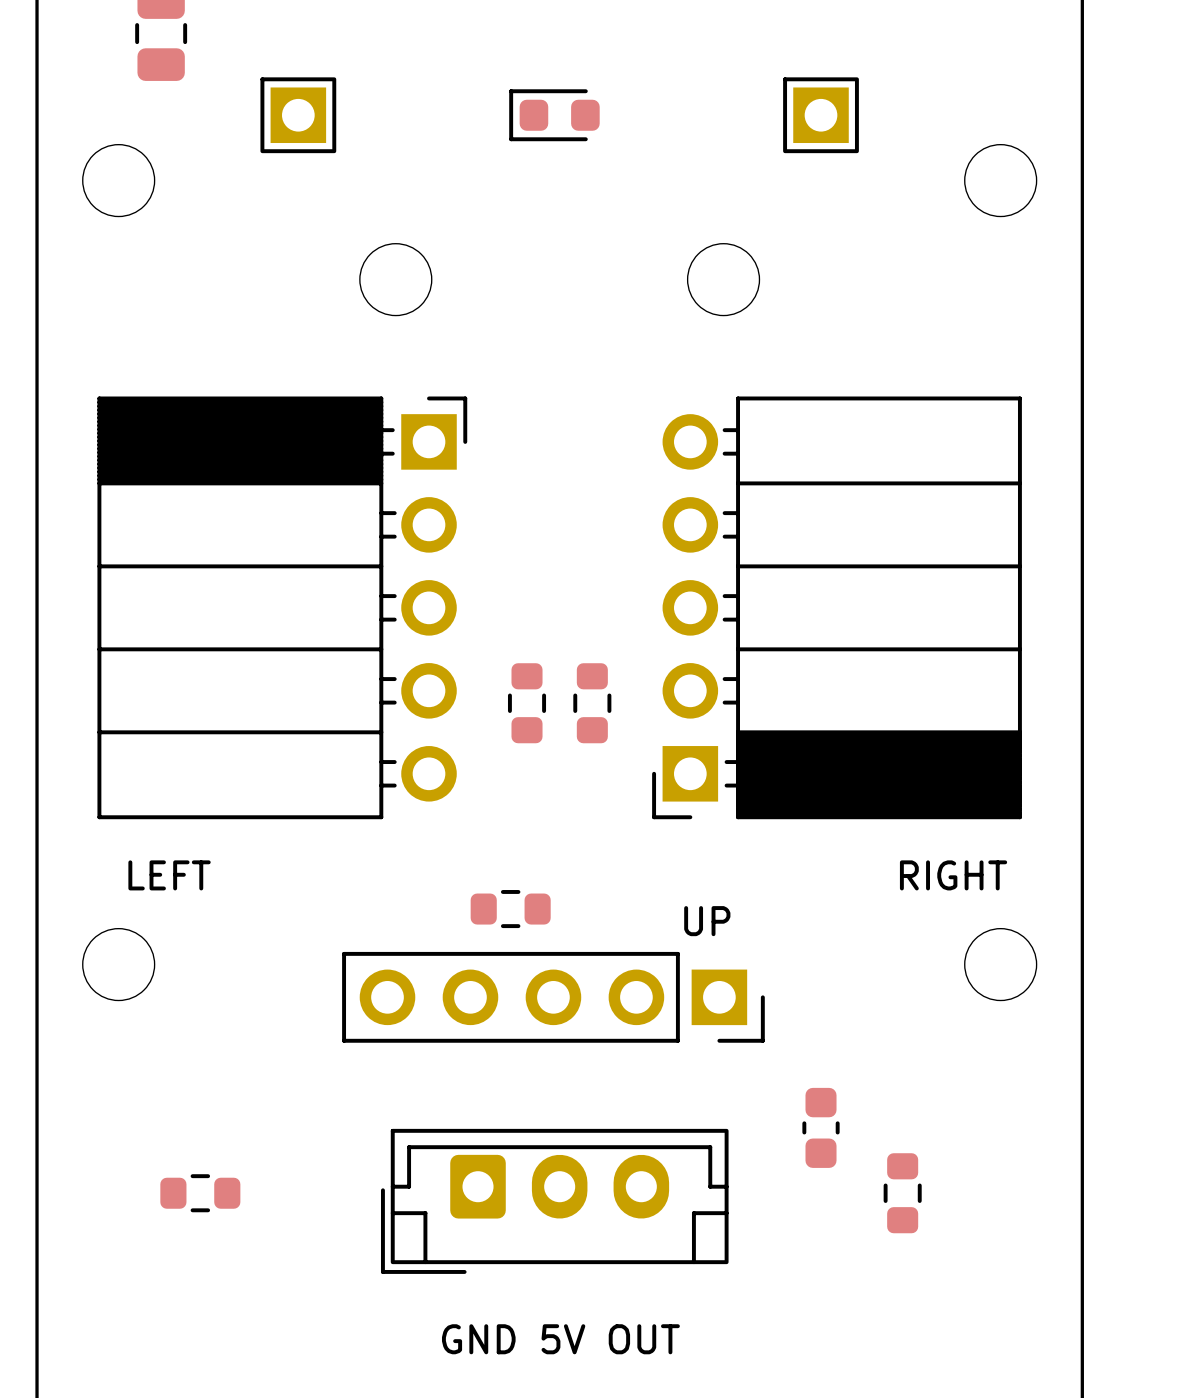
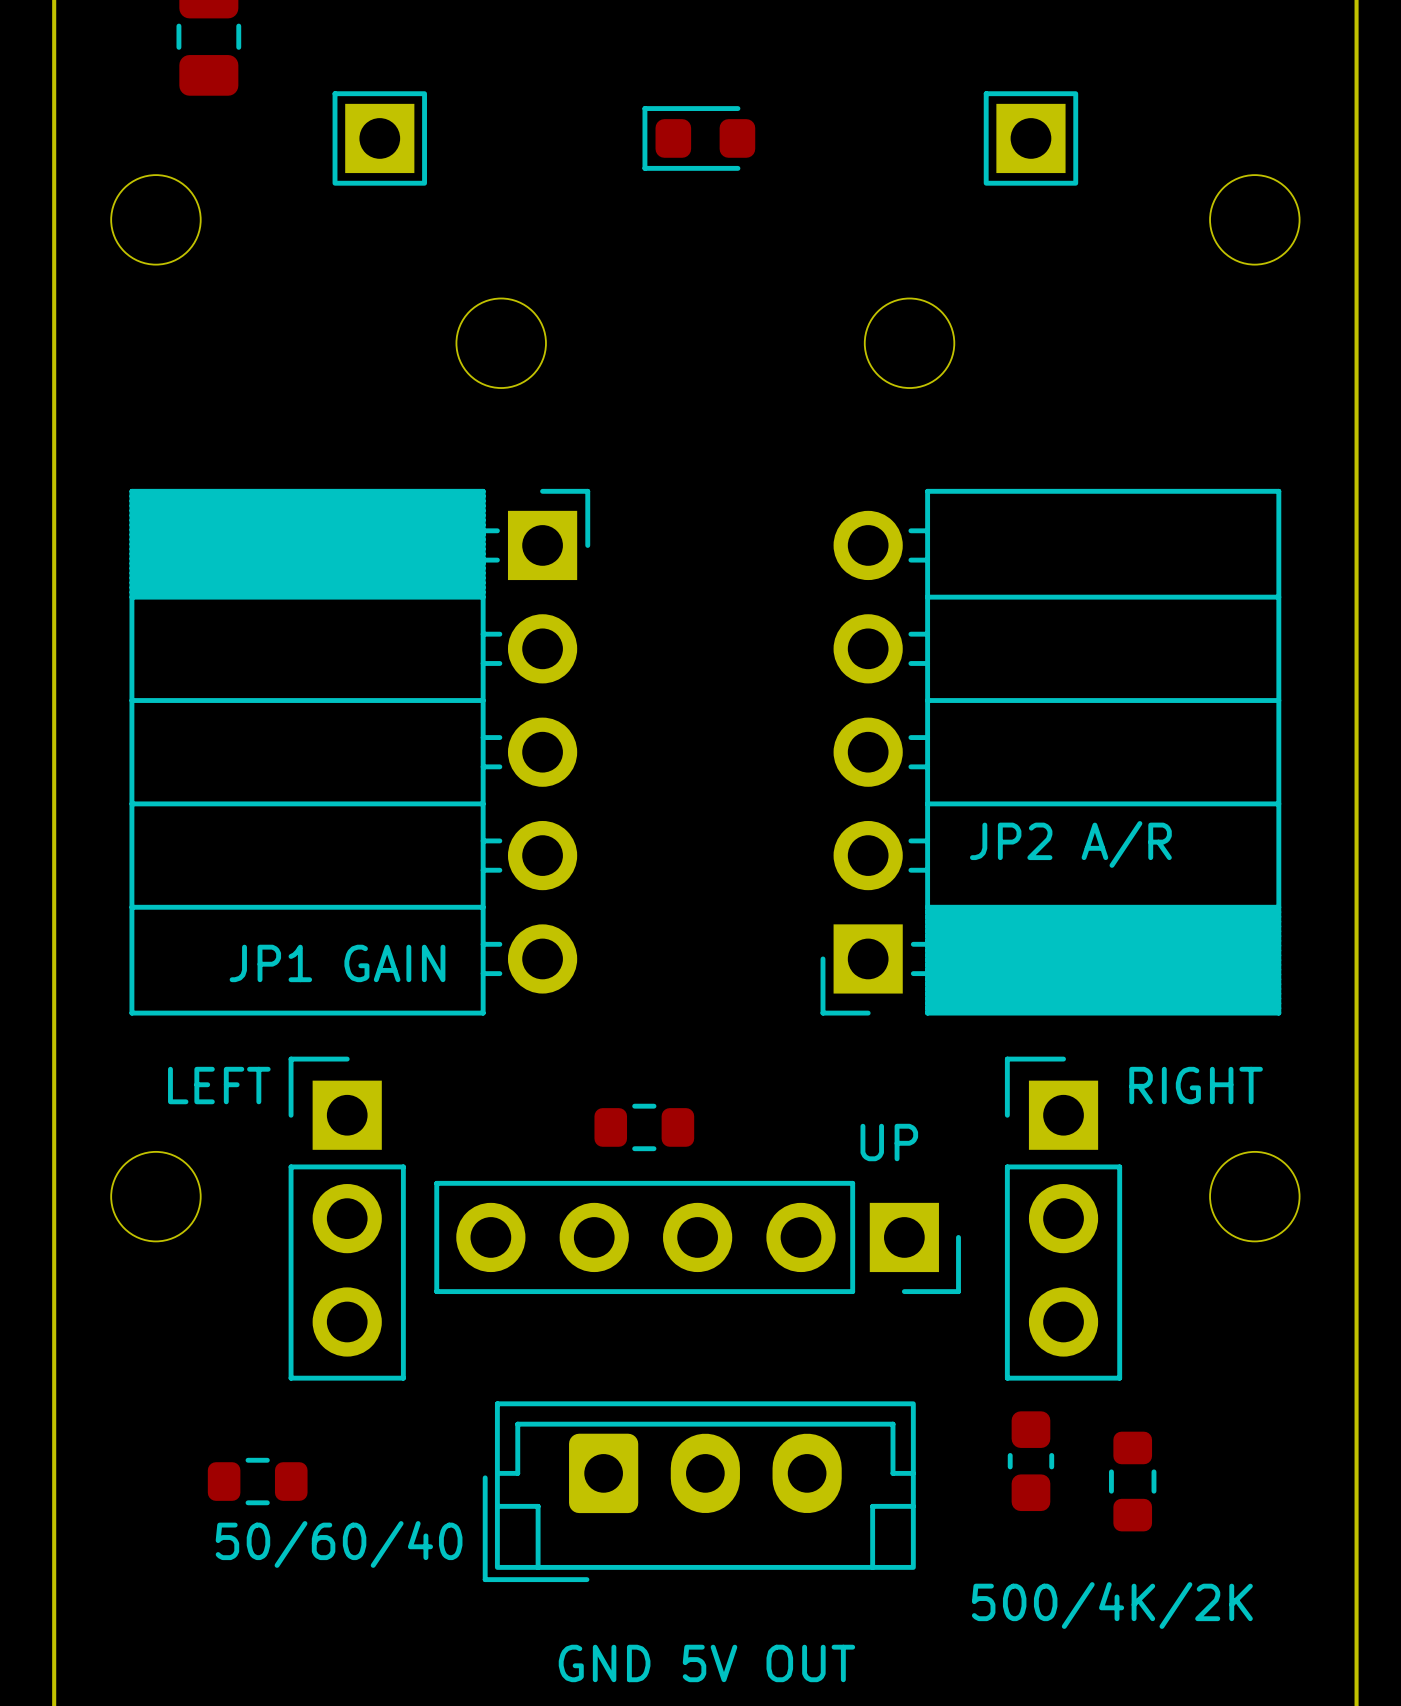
text: none -> JP2 A/R (1070, 844)
part: (527, 703) -> none
part: (592, 703) -> none
text: none -> JP1 GAIN (337, 963)
part: none -> (347, 1218)
part: none -> (1063, 1218)
part position: (821, 1127) -> (1030, 1461)
text: none -> 50/60/40 (339, 1544)
text: none -> 500/4K/2K (1112, 1605)

